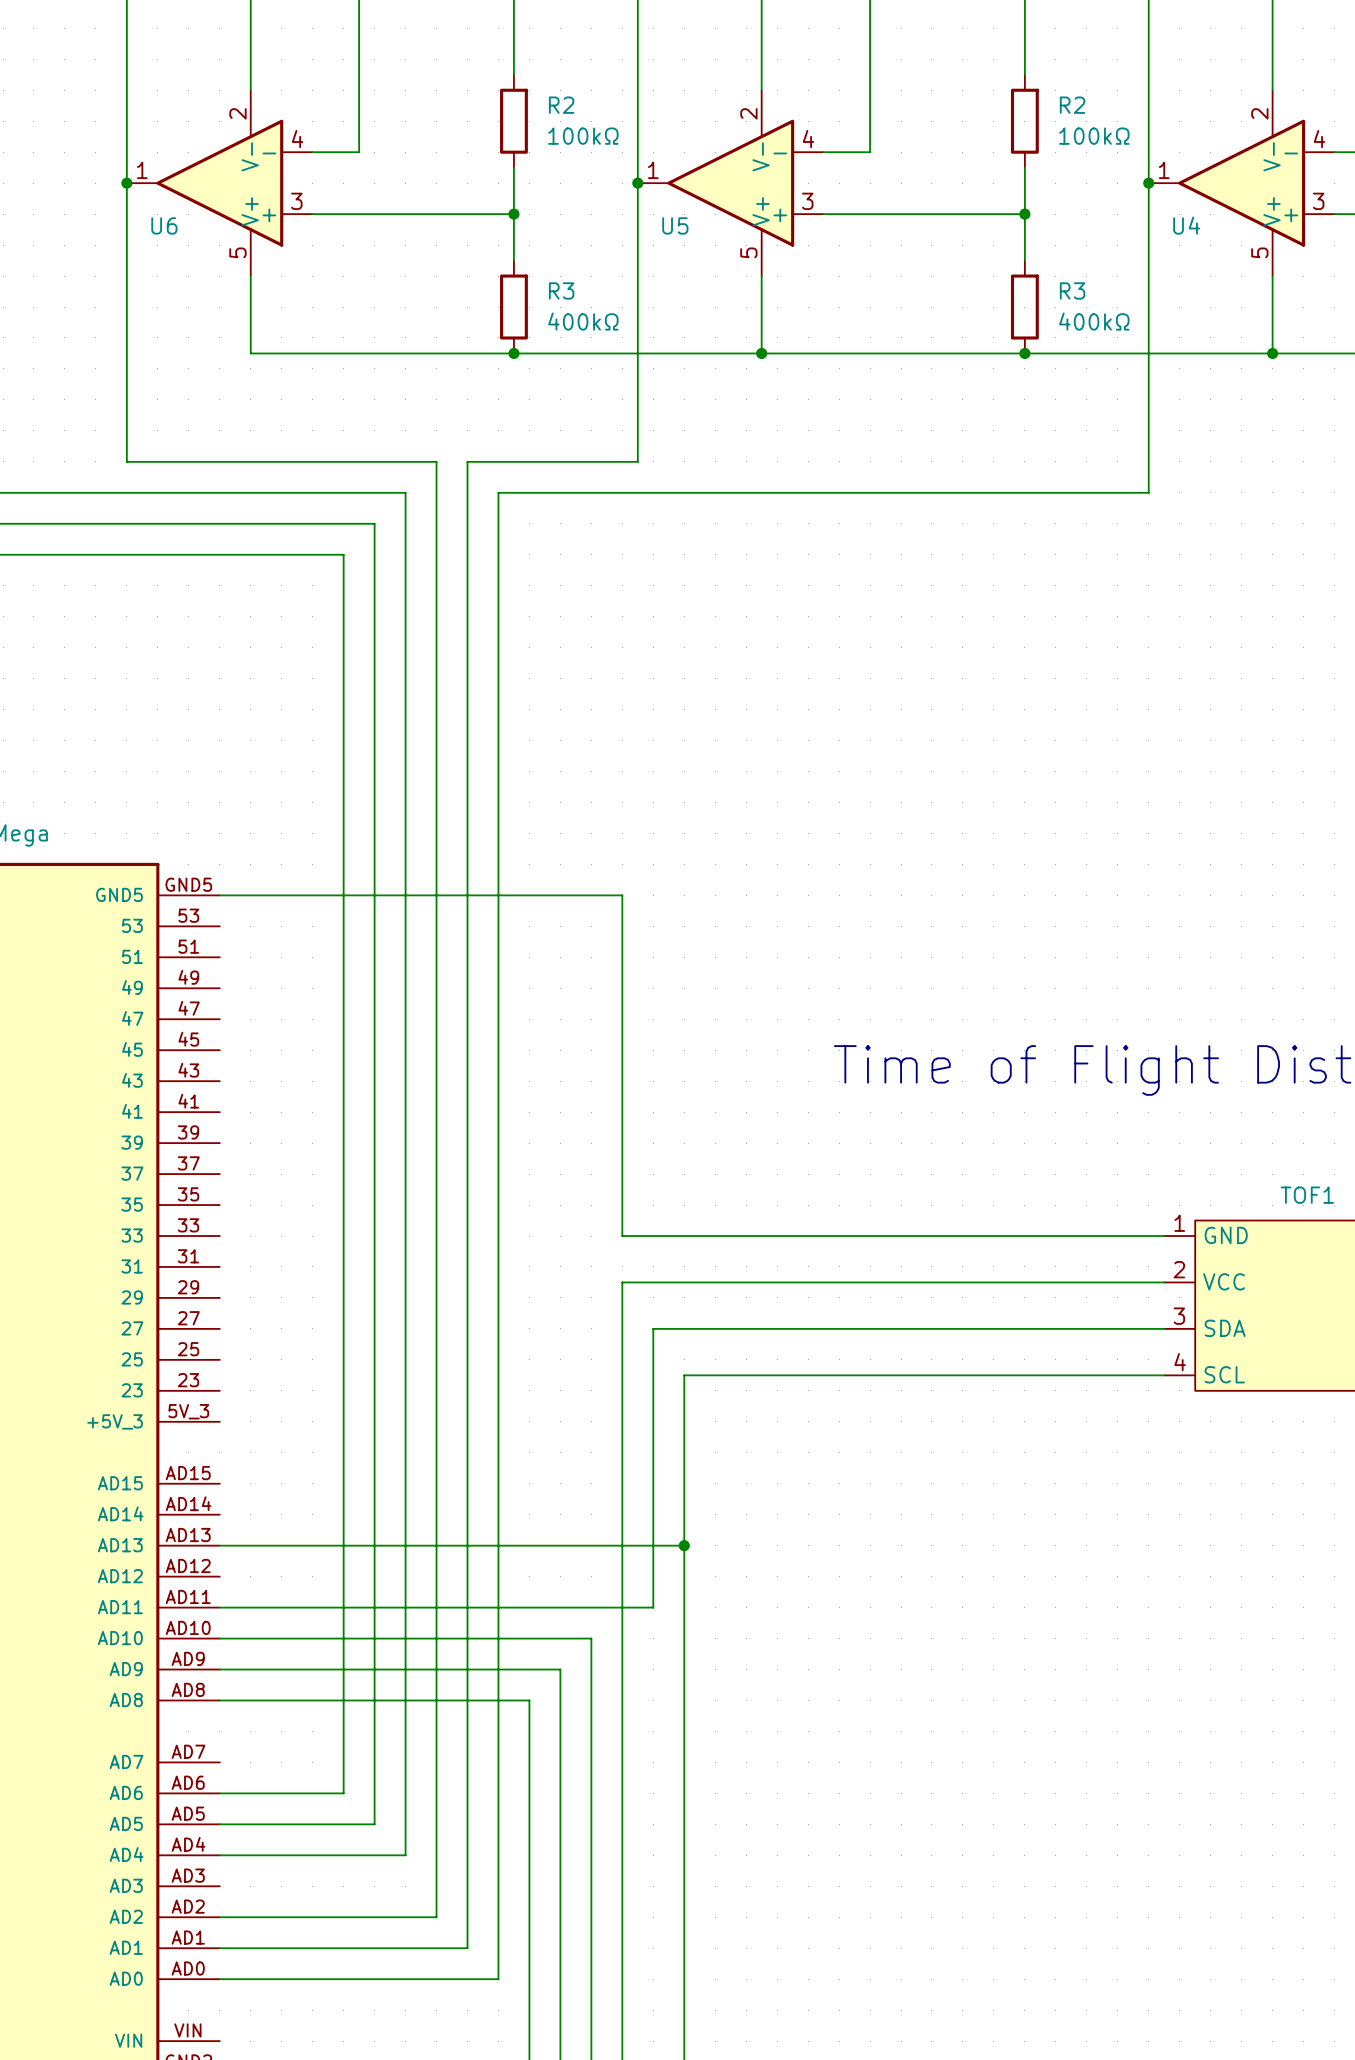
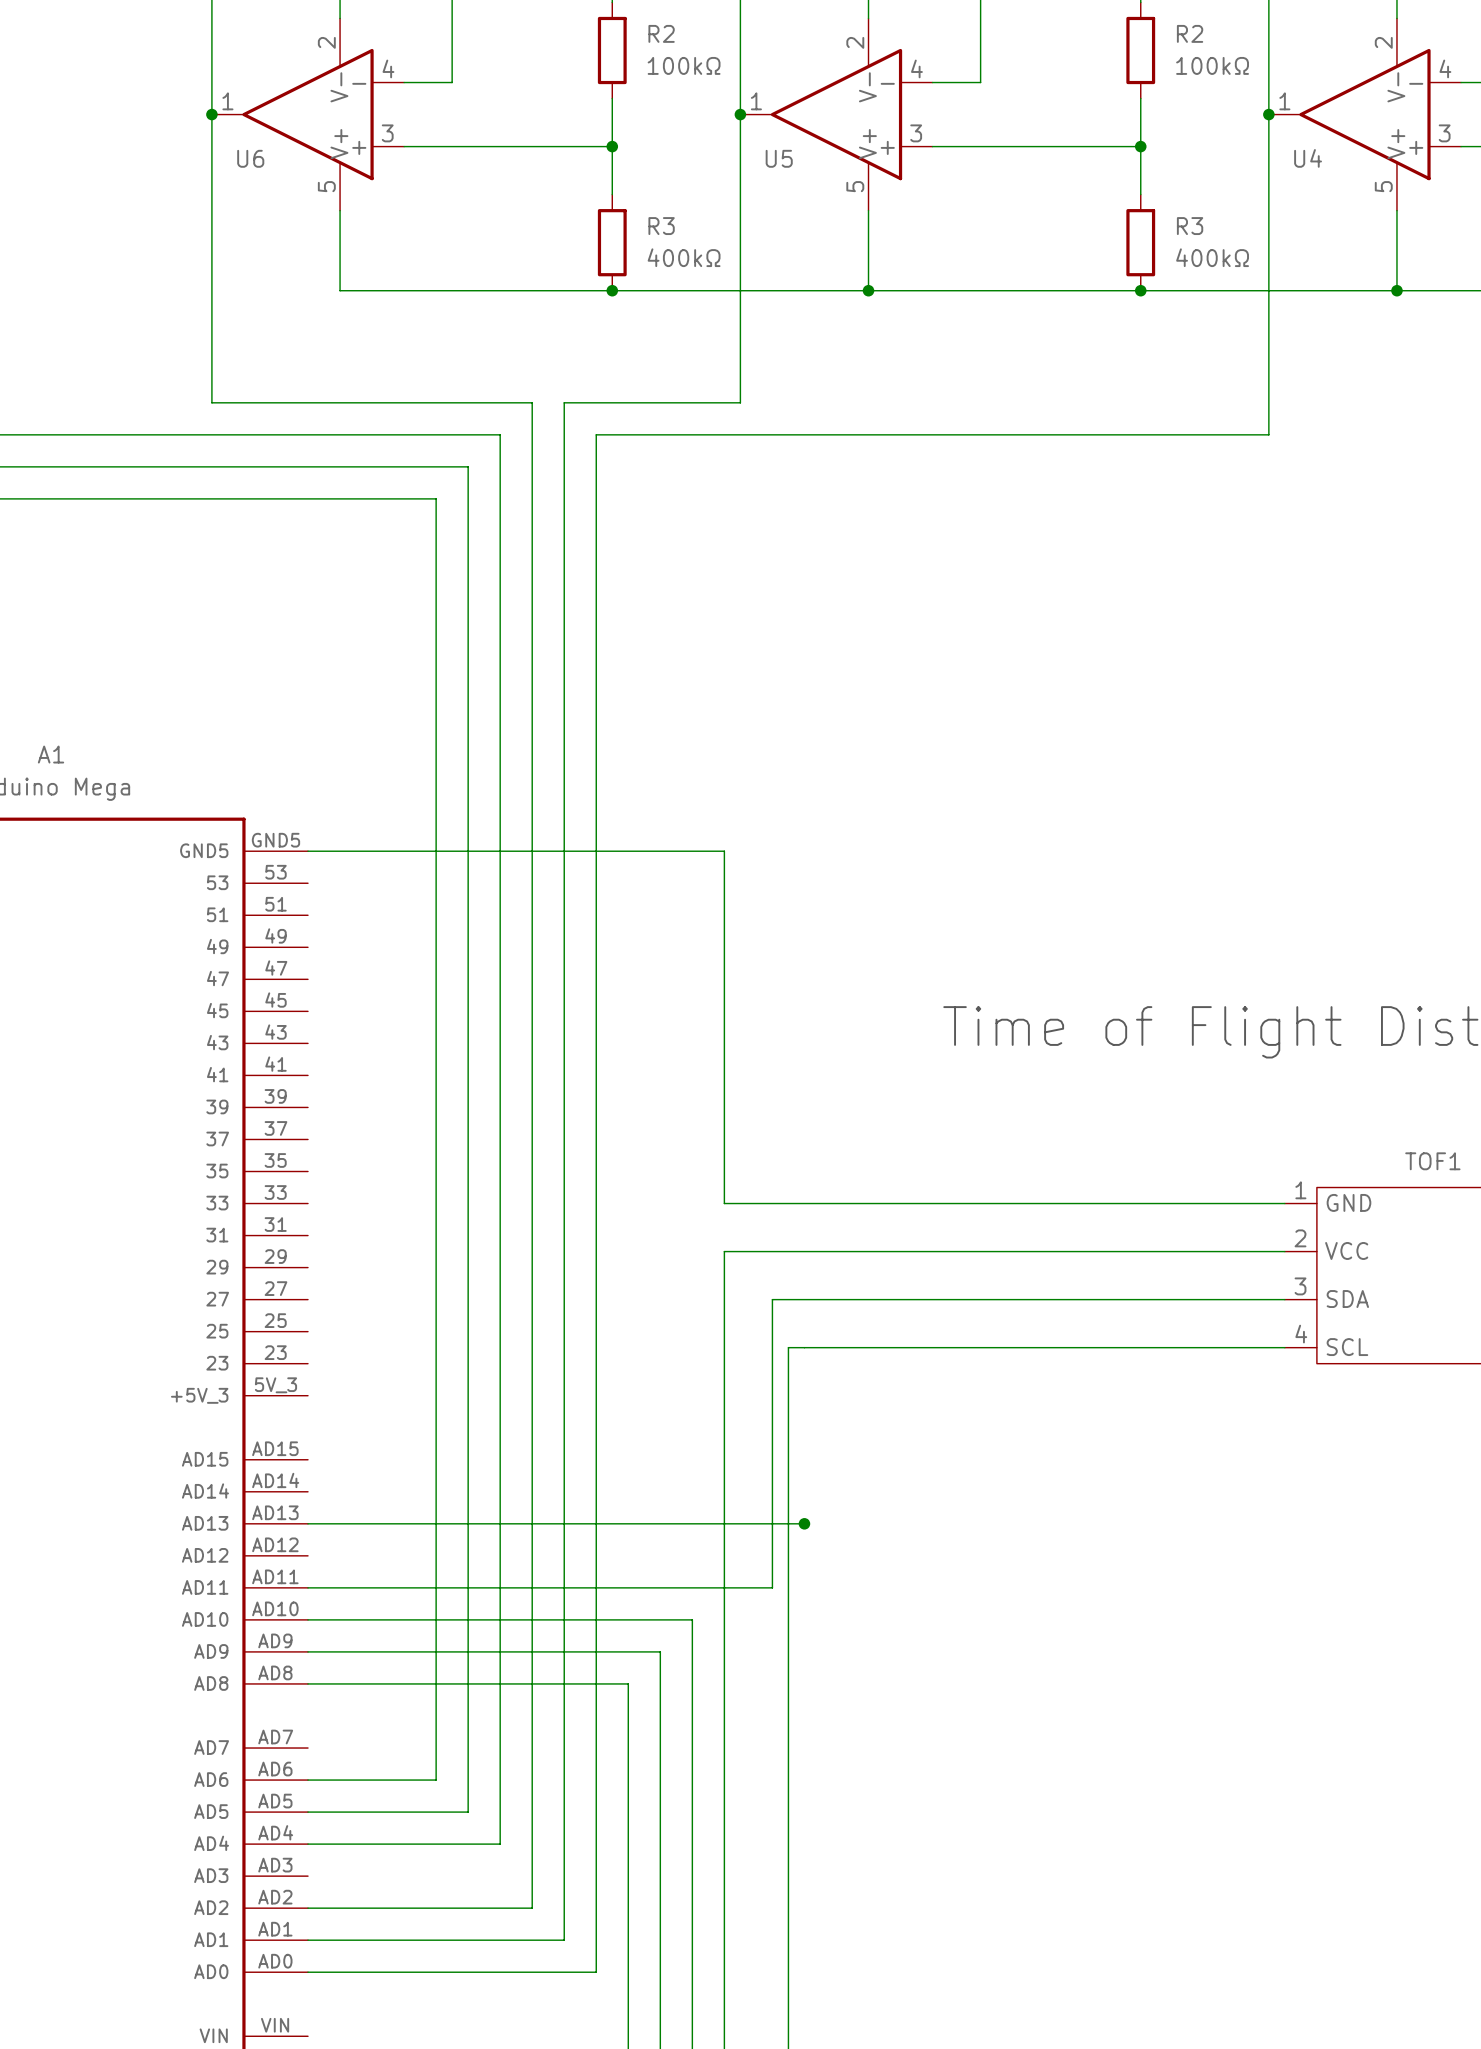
wire: (668, 1328) (653, 1328) (653, 1607) -> (772, 1299) (772, 1587) (756, 1587)
wire: none -> (788, 1523) (804, 1523)
junction position: (684, 1545) -> (804, 1523)

